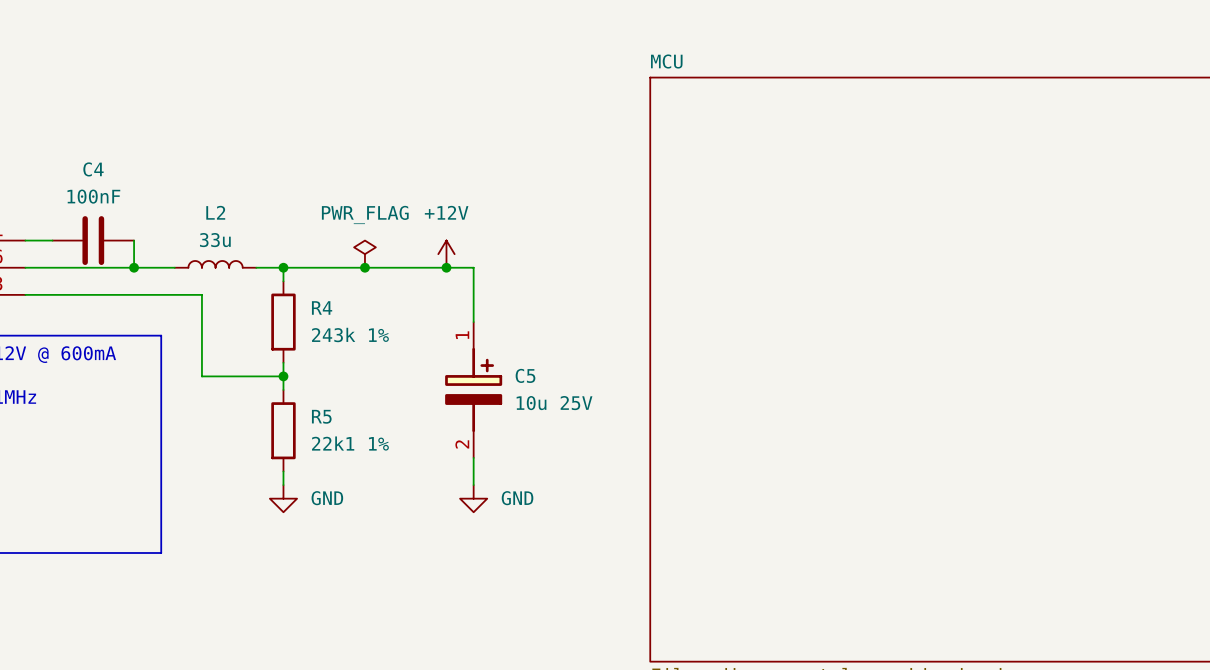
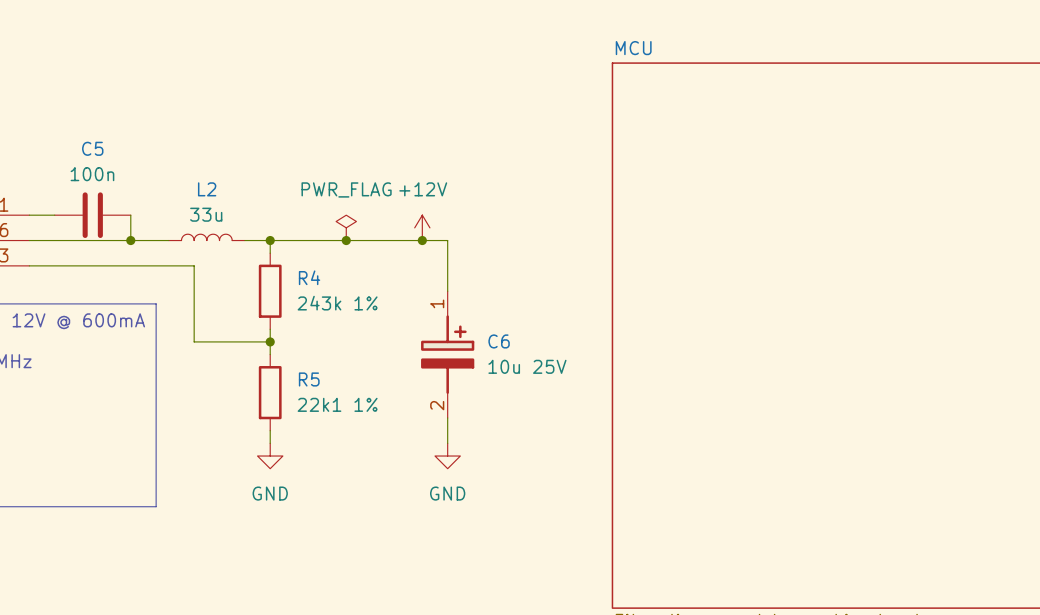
C4 name: C4 (93, 169) -> C5 (92, 148)
C4 value: 100nF (93, 196) -> 100n (92, 174)
C5 name: C5 (525, 375) -> C6 (499, 341)
power symbol text position: GND (327, 498) -> GND (270, 493)
power symbol text position: GND (517, 498) -> GND (447, 493)

